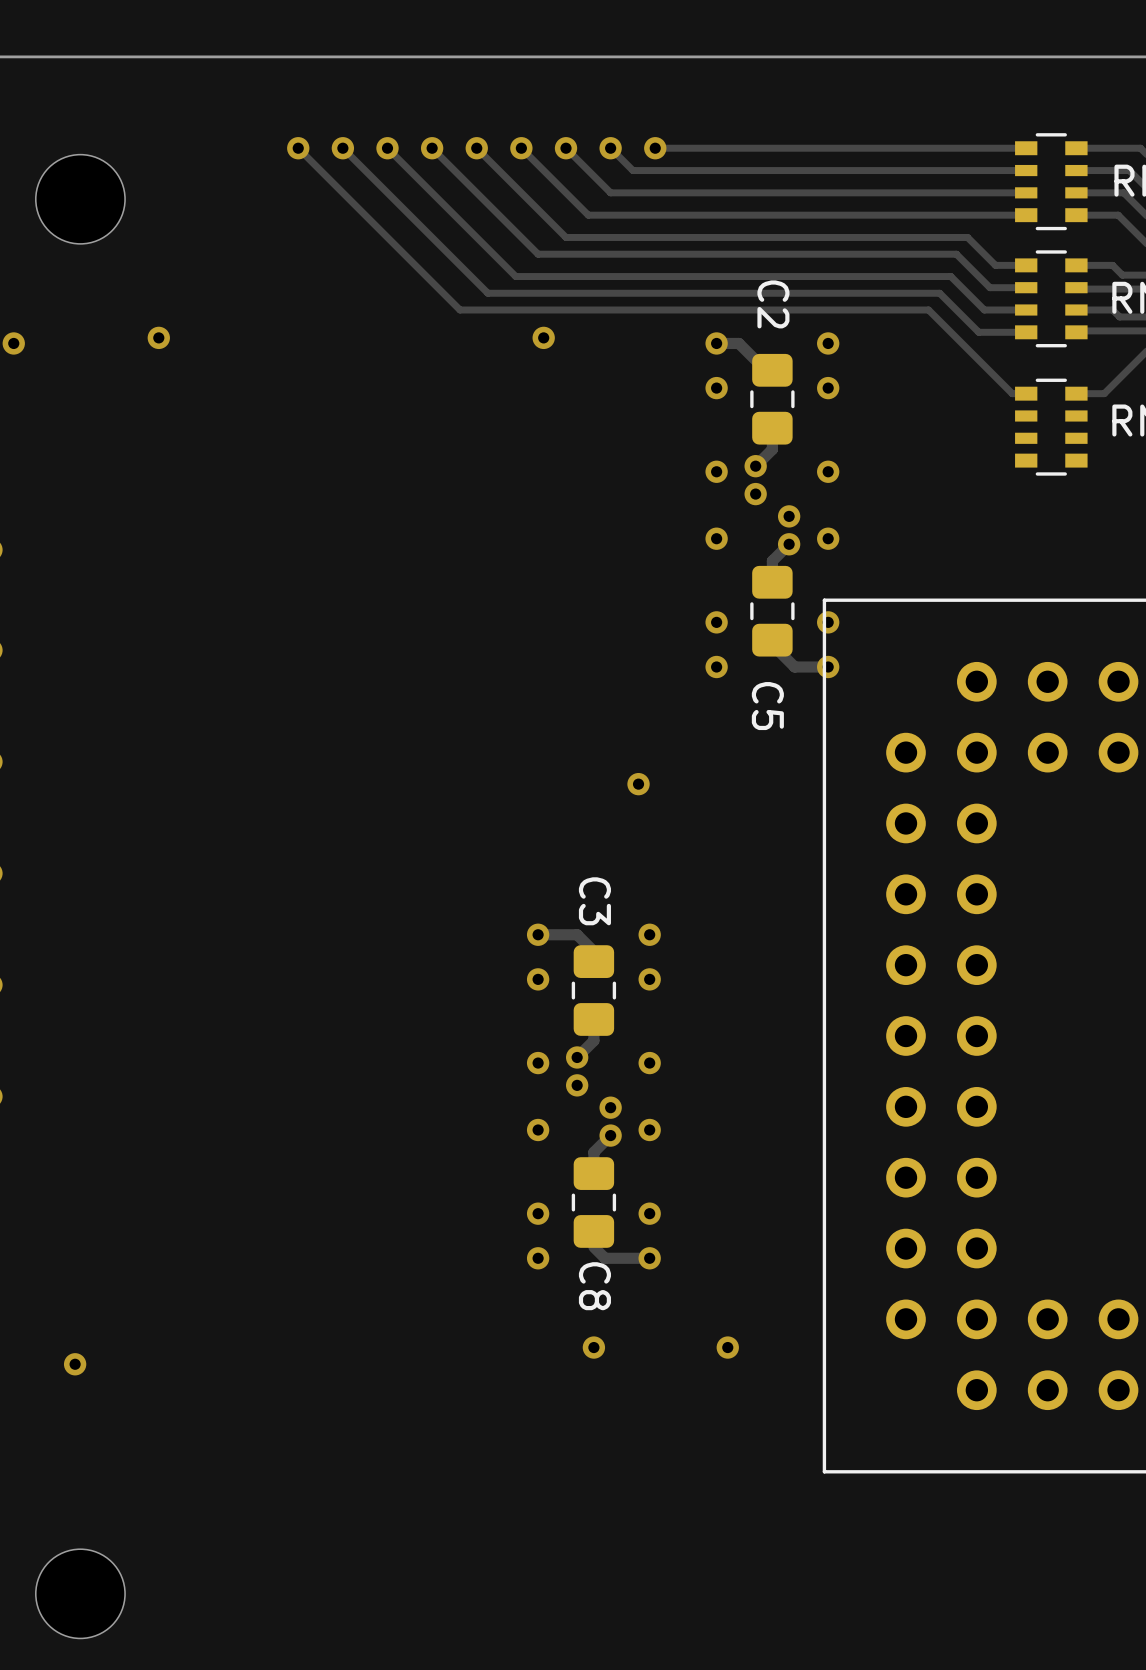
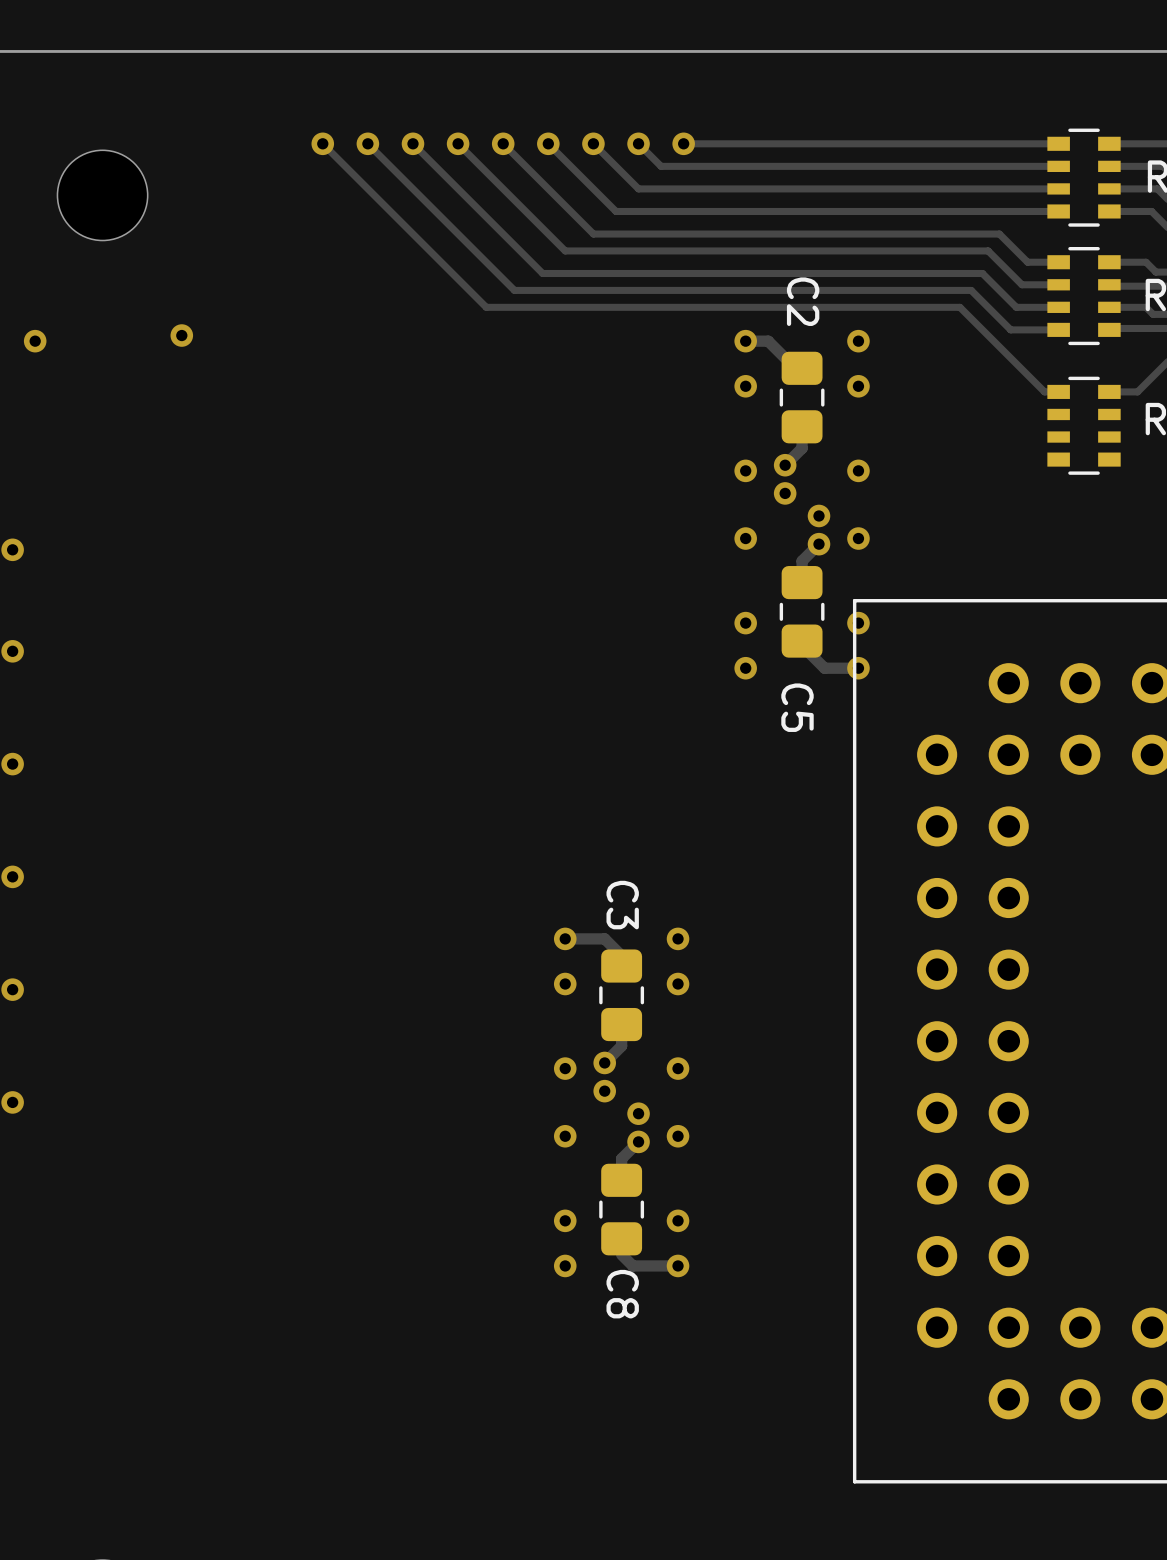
via: (543, 337) -> none
via: (638, 784) -> none
via: (593, 1347) -> none
via: (727, 1347) -> none
via: (75, 1364) -> none

